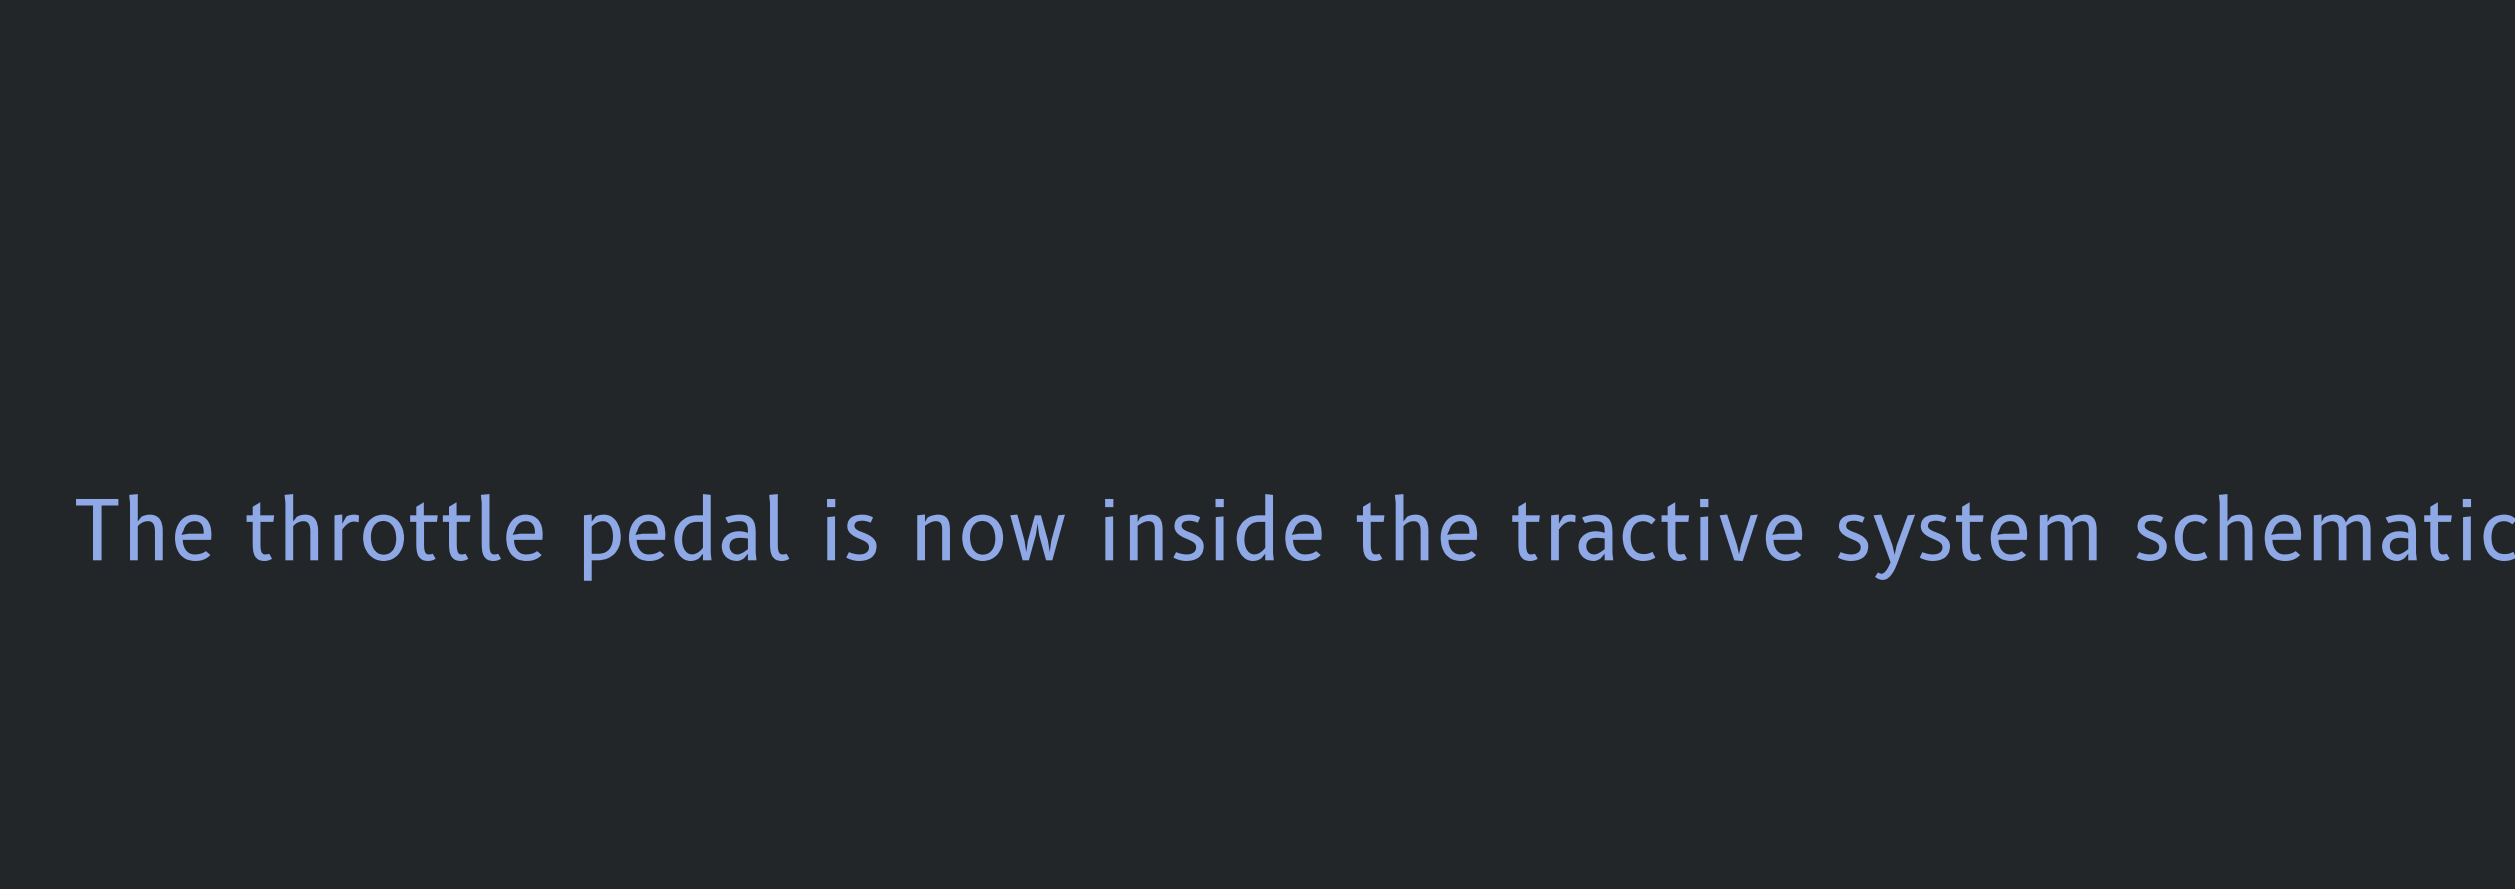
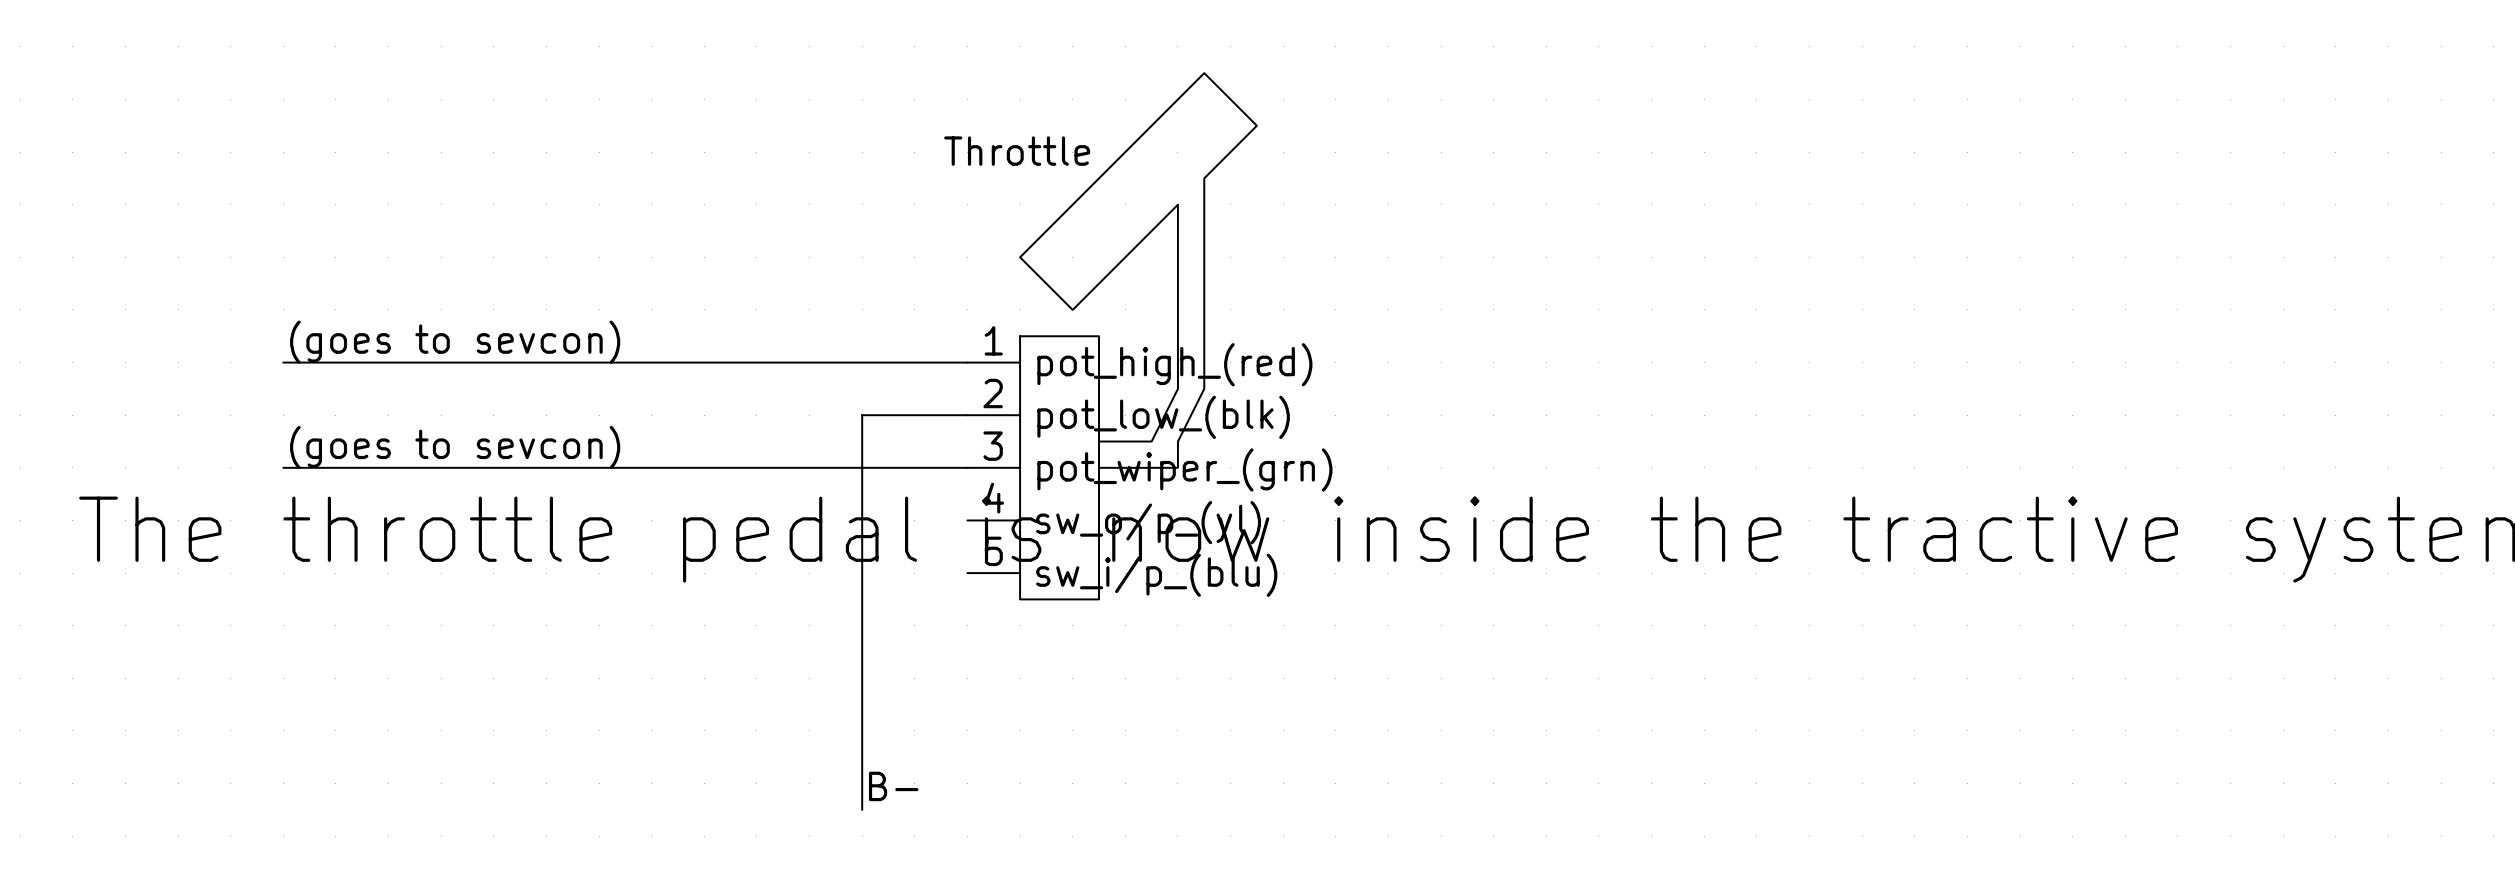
part: none -> Throttle (1112, 336)
label: none -> (goes to sevcon) (455, 342)
wire: none -> (283, 362) (967, 362)
wire: none -> (967, 415) (862, 415) (862, 809)
label: none -> (goes to sevcon) (455, 447)
wire: none -> (283, 467) (967, 467)
label: none -> B- (893, 786)

